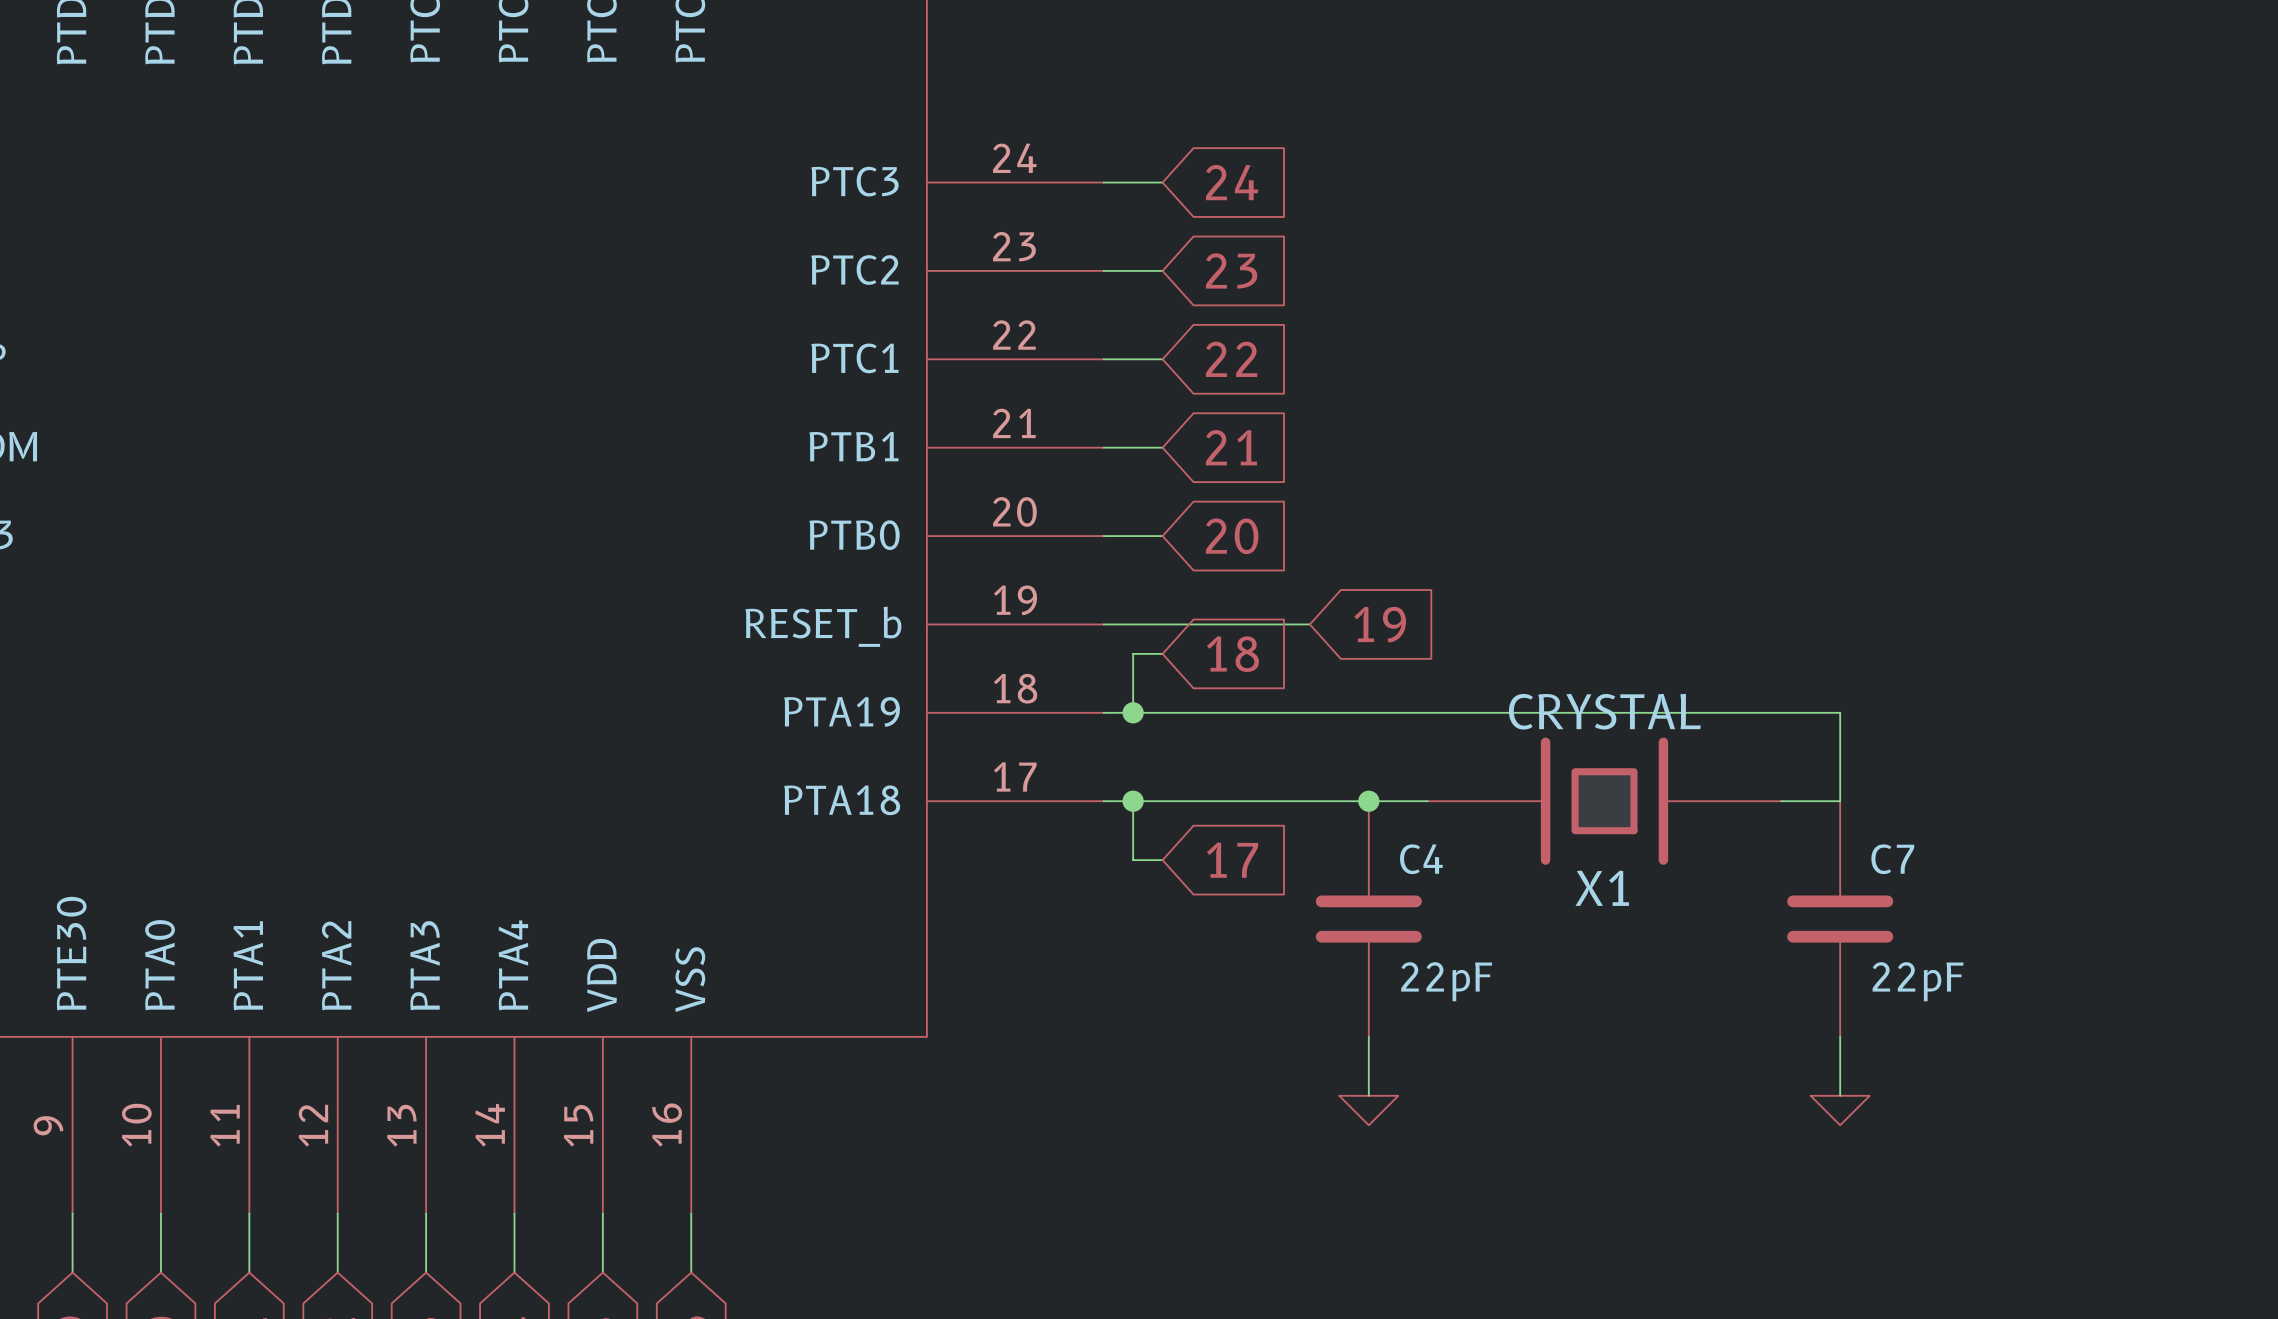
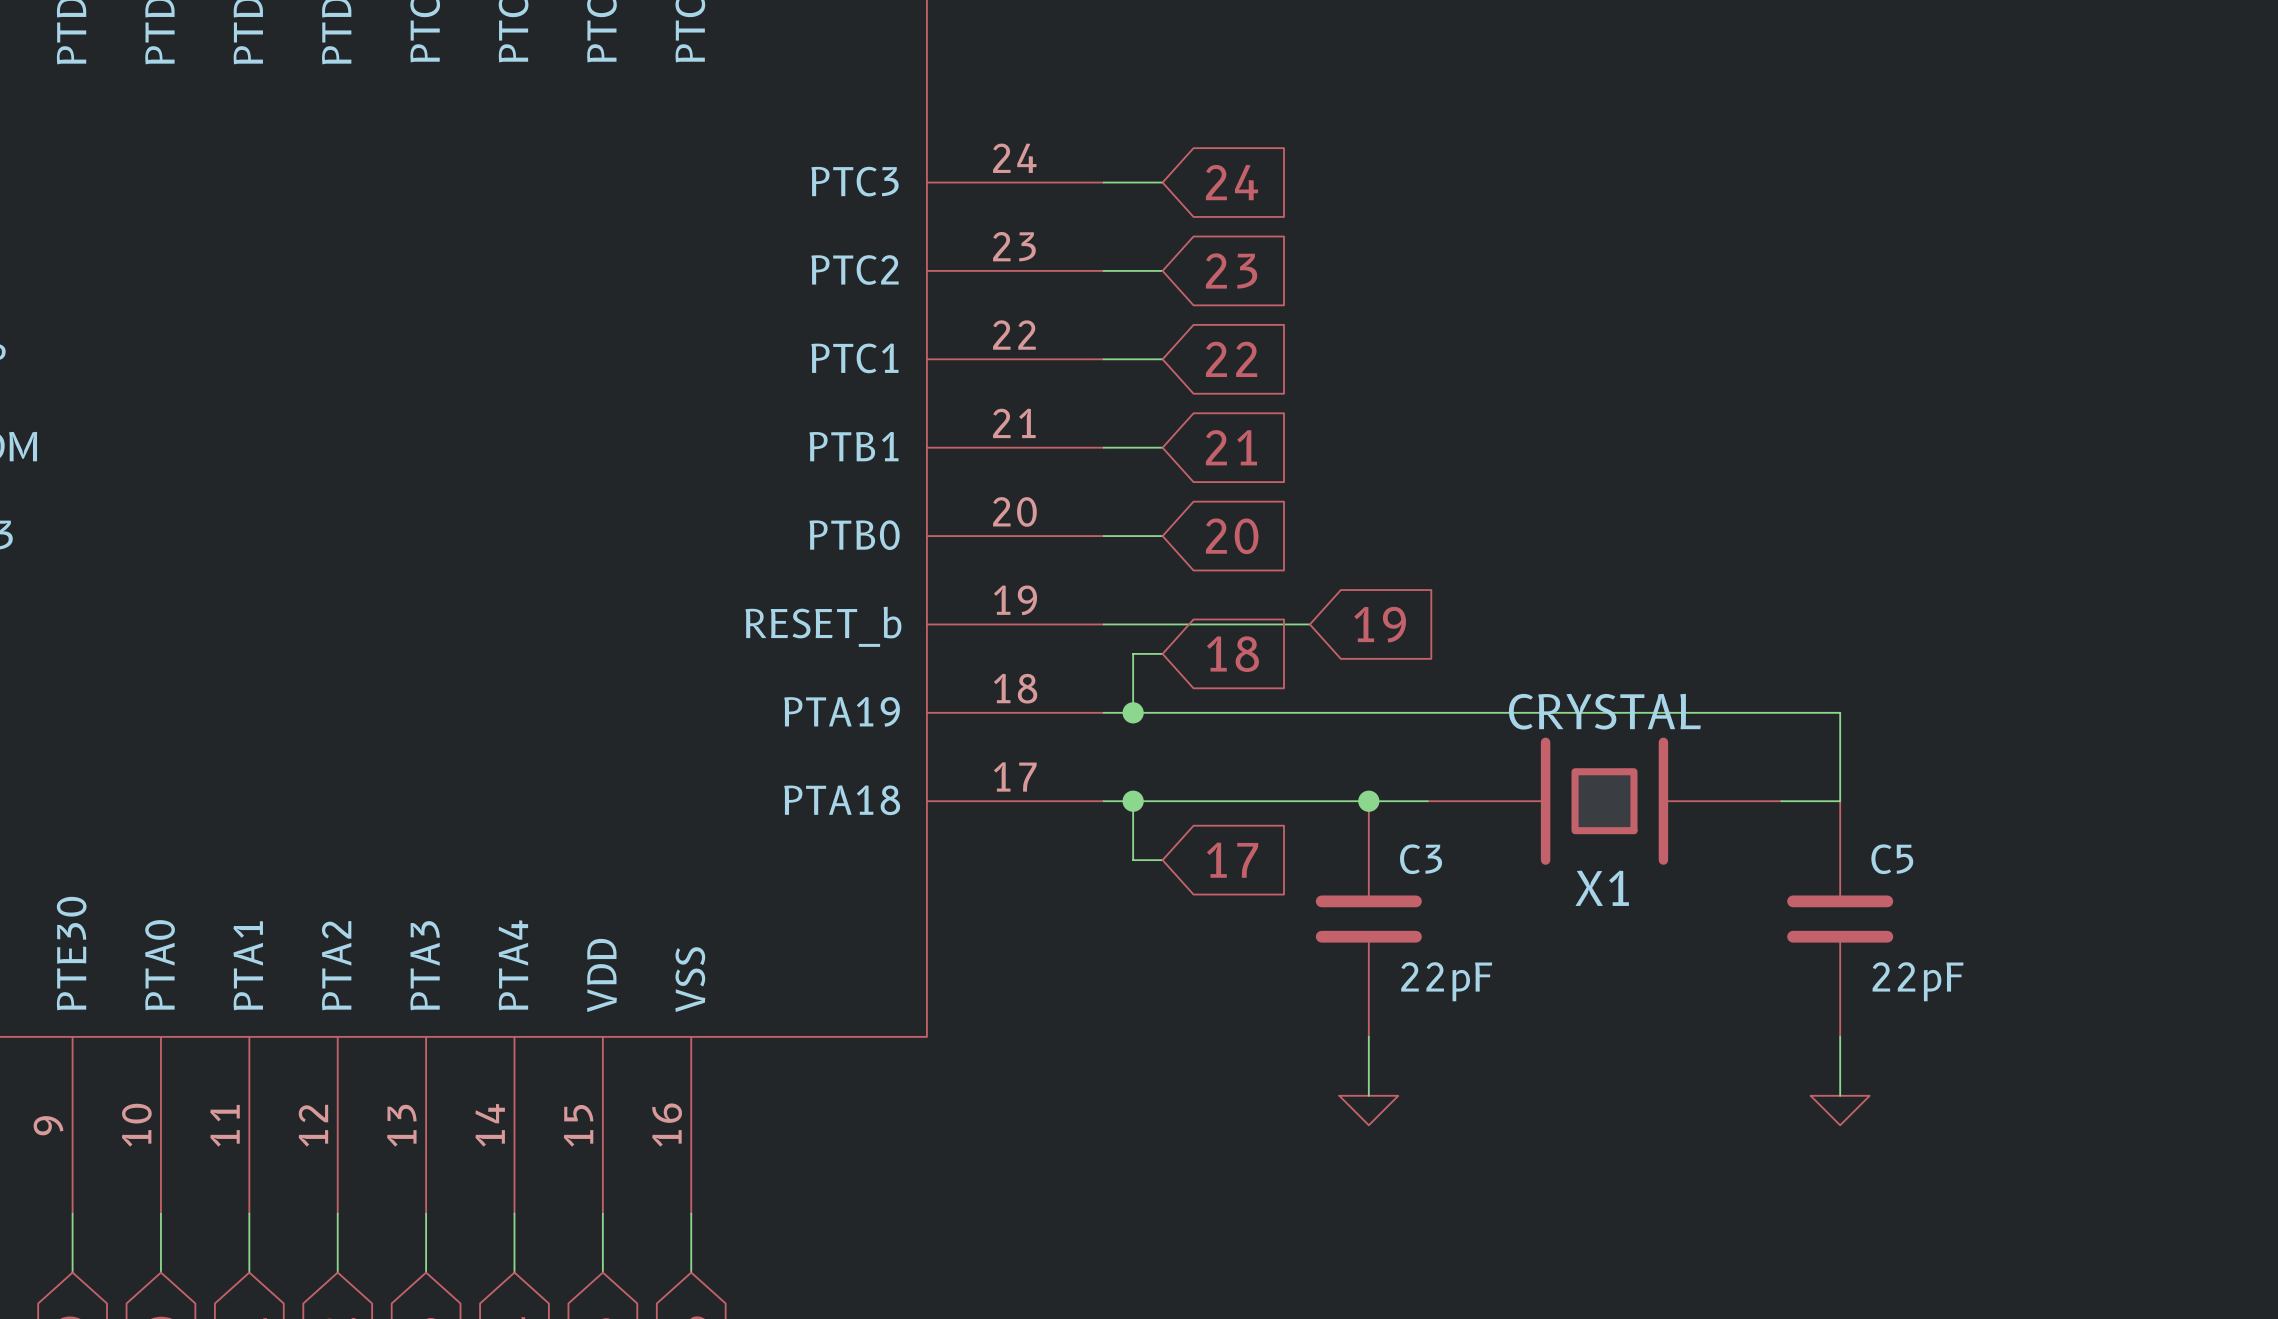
C4 name: C4 (1421, 859) -> C3 (1421, 859)
C7 name: C7 (1892, 859) -> C5 (1892, 859)

